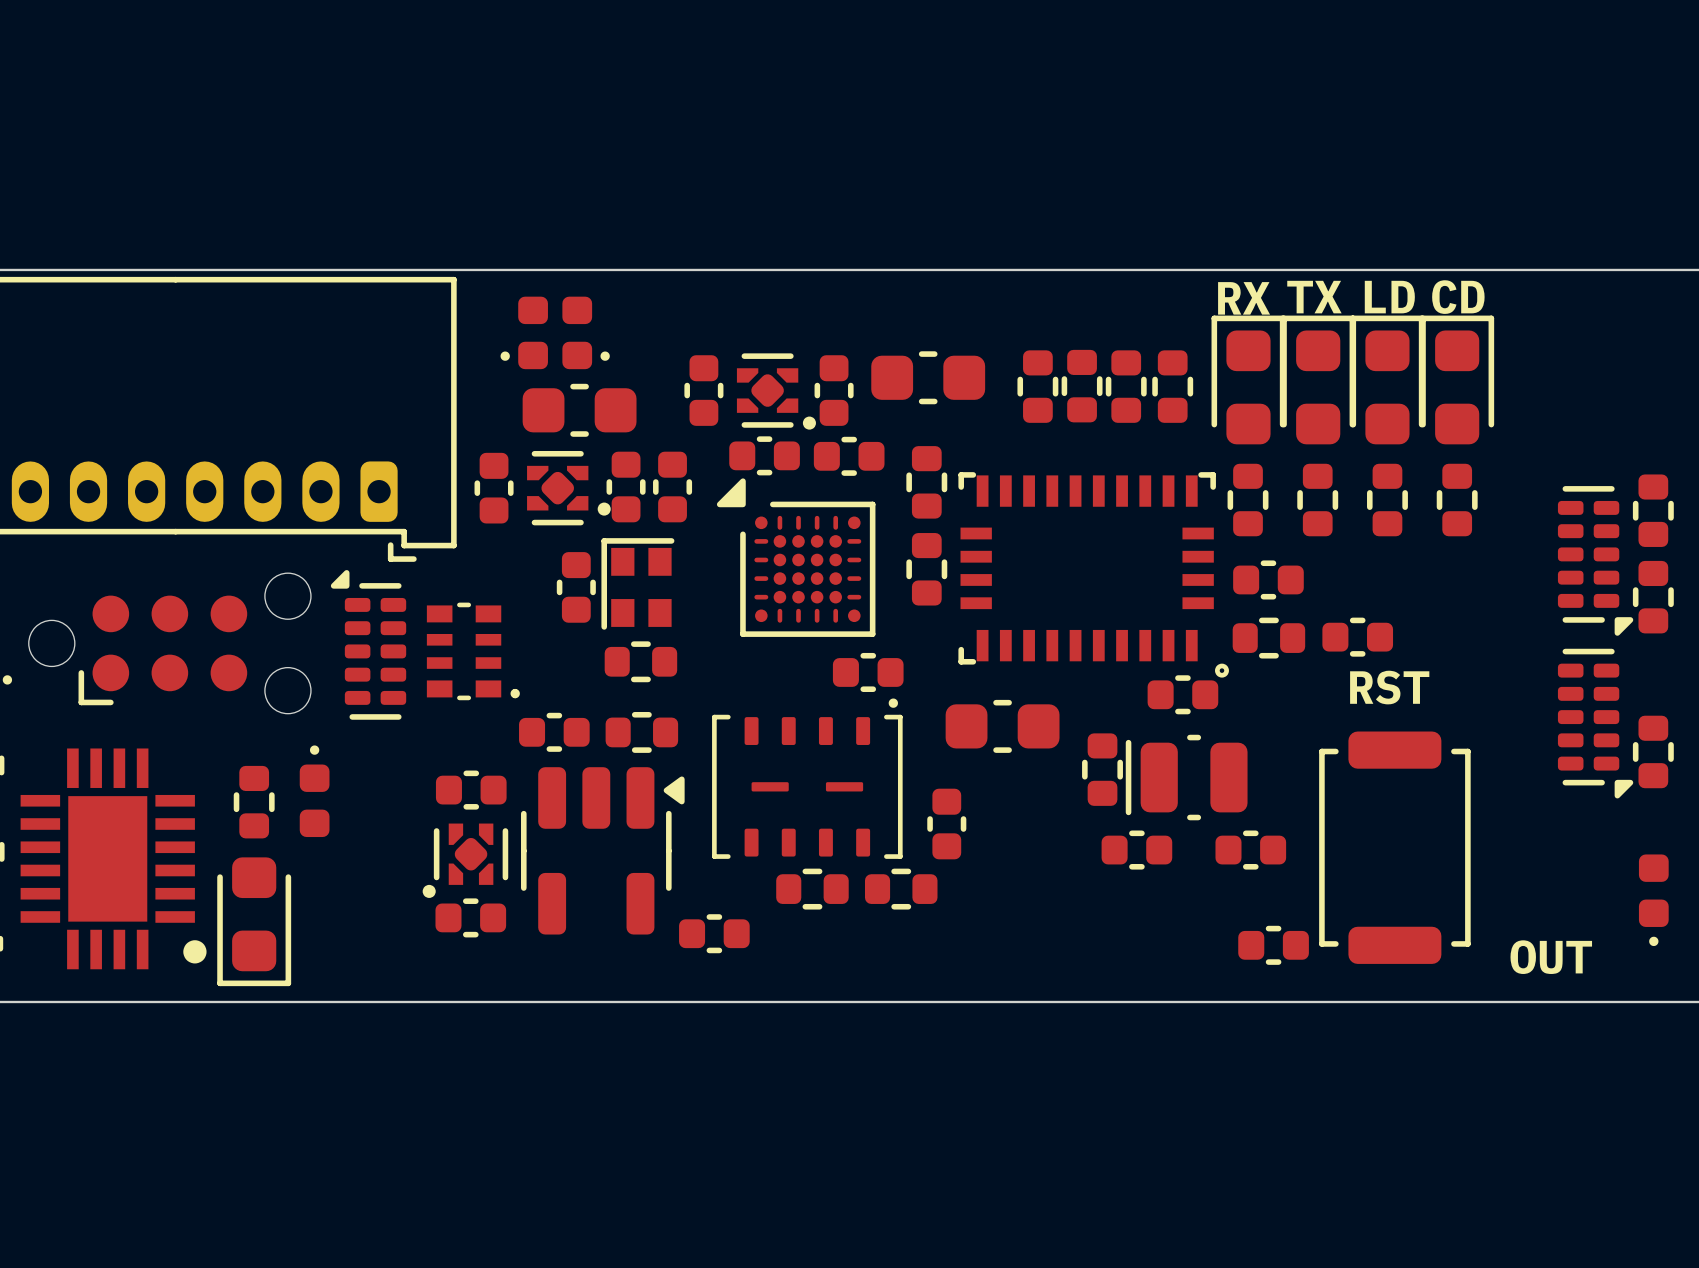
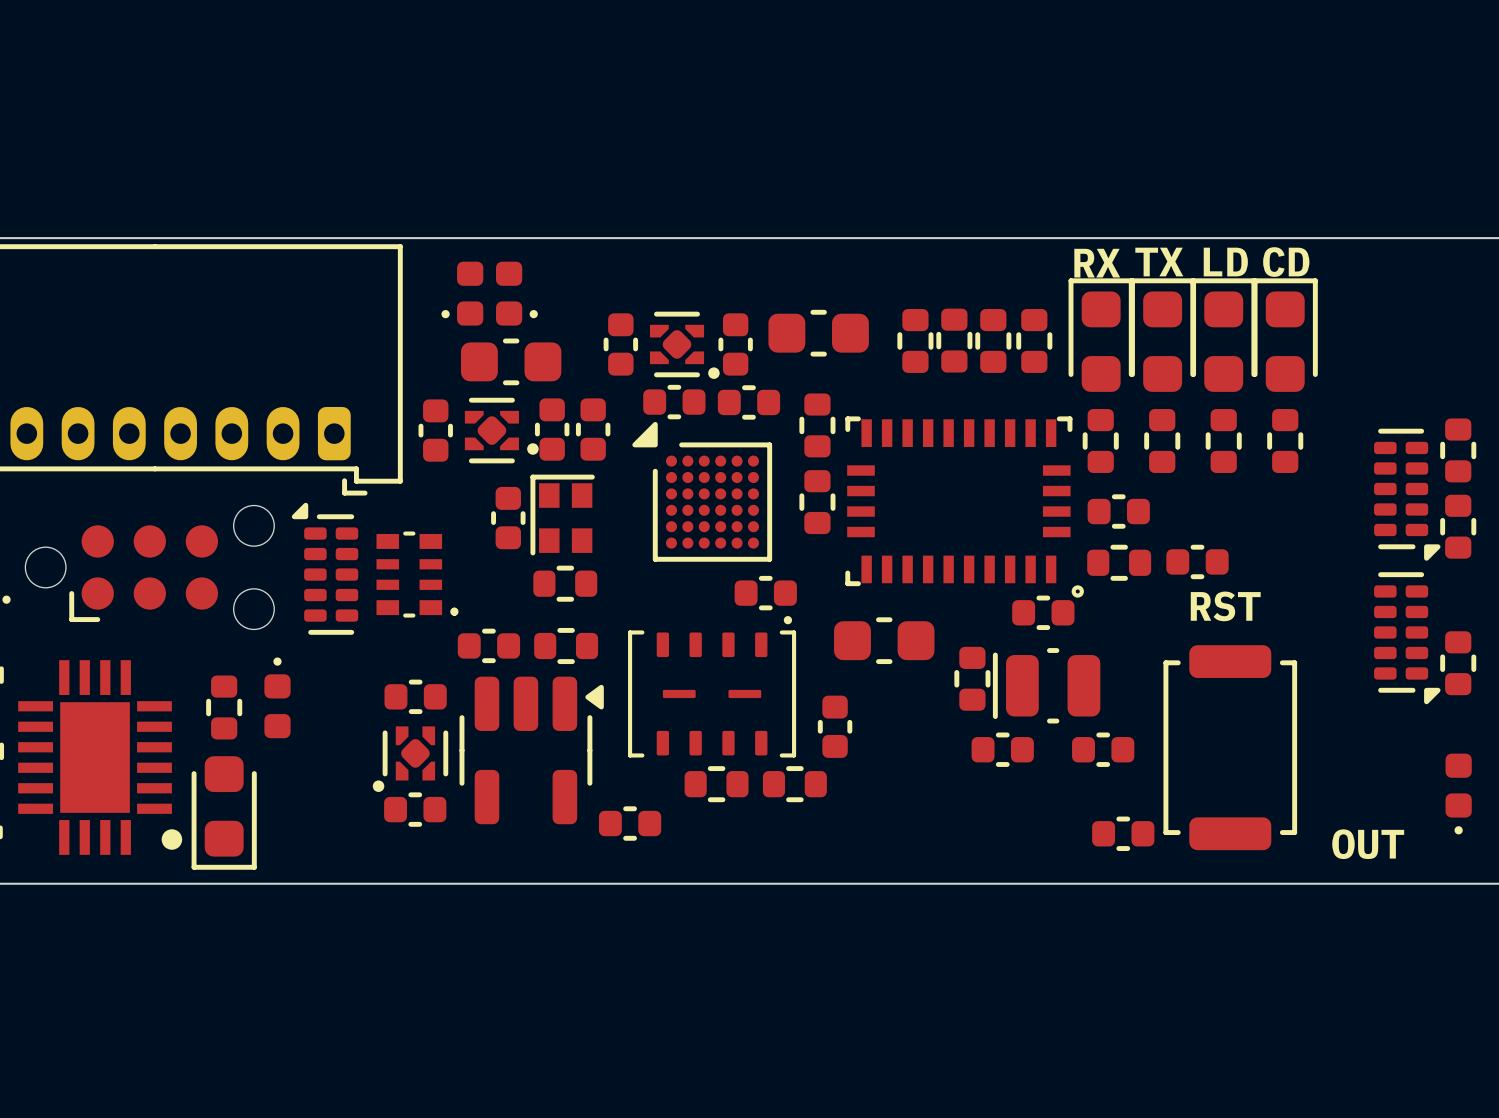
part footprint: [716, 478, 876, 637] -> [632, 421, 773, 562]

